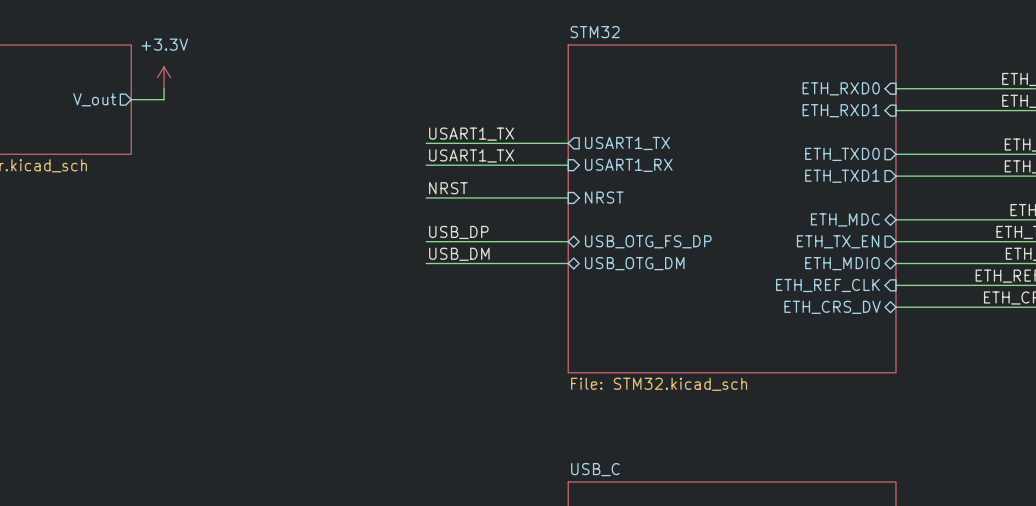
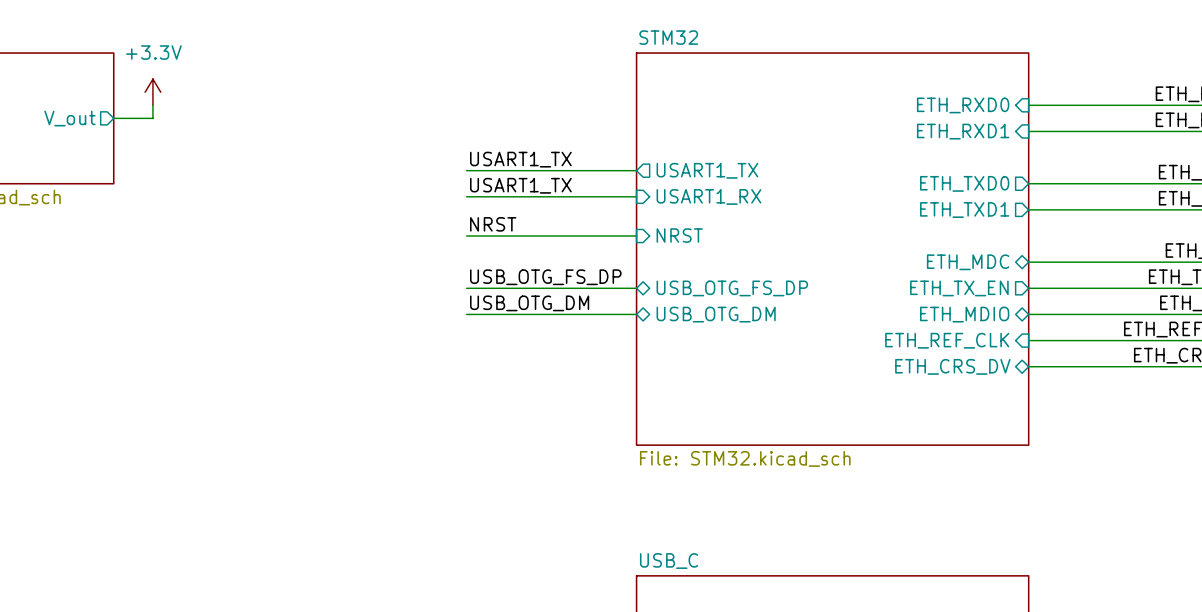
label: USB_DP (458, 232) -> USB_OTG_FS_DP (545, 277)
label: USB_DM (459, 254) -> USB_OTG_DM (529, 303)

